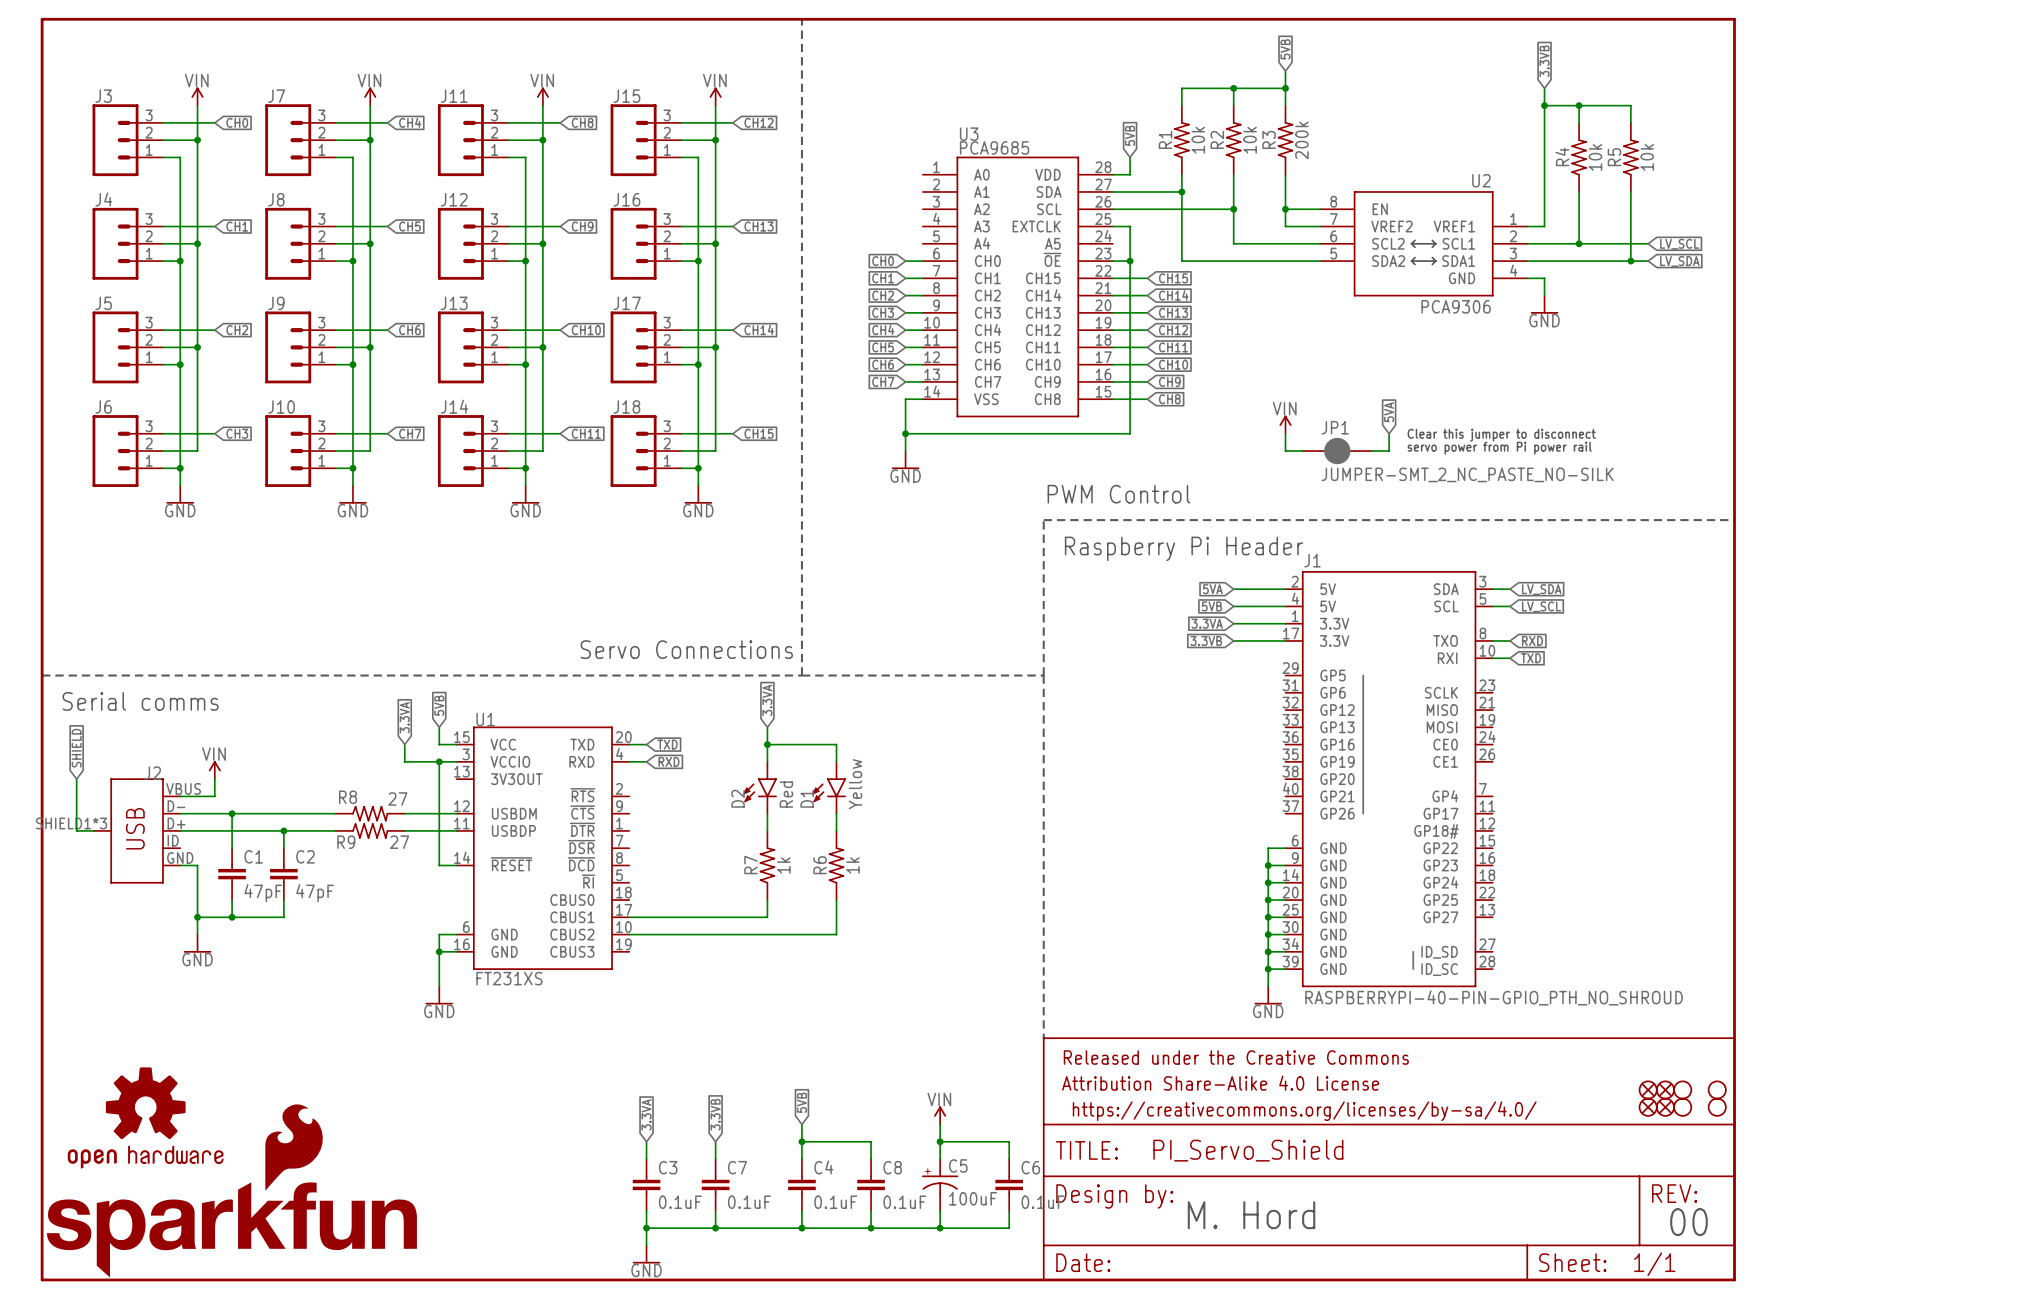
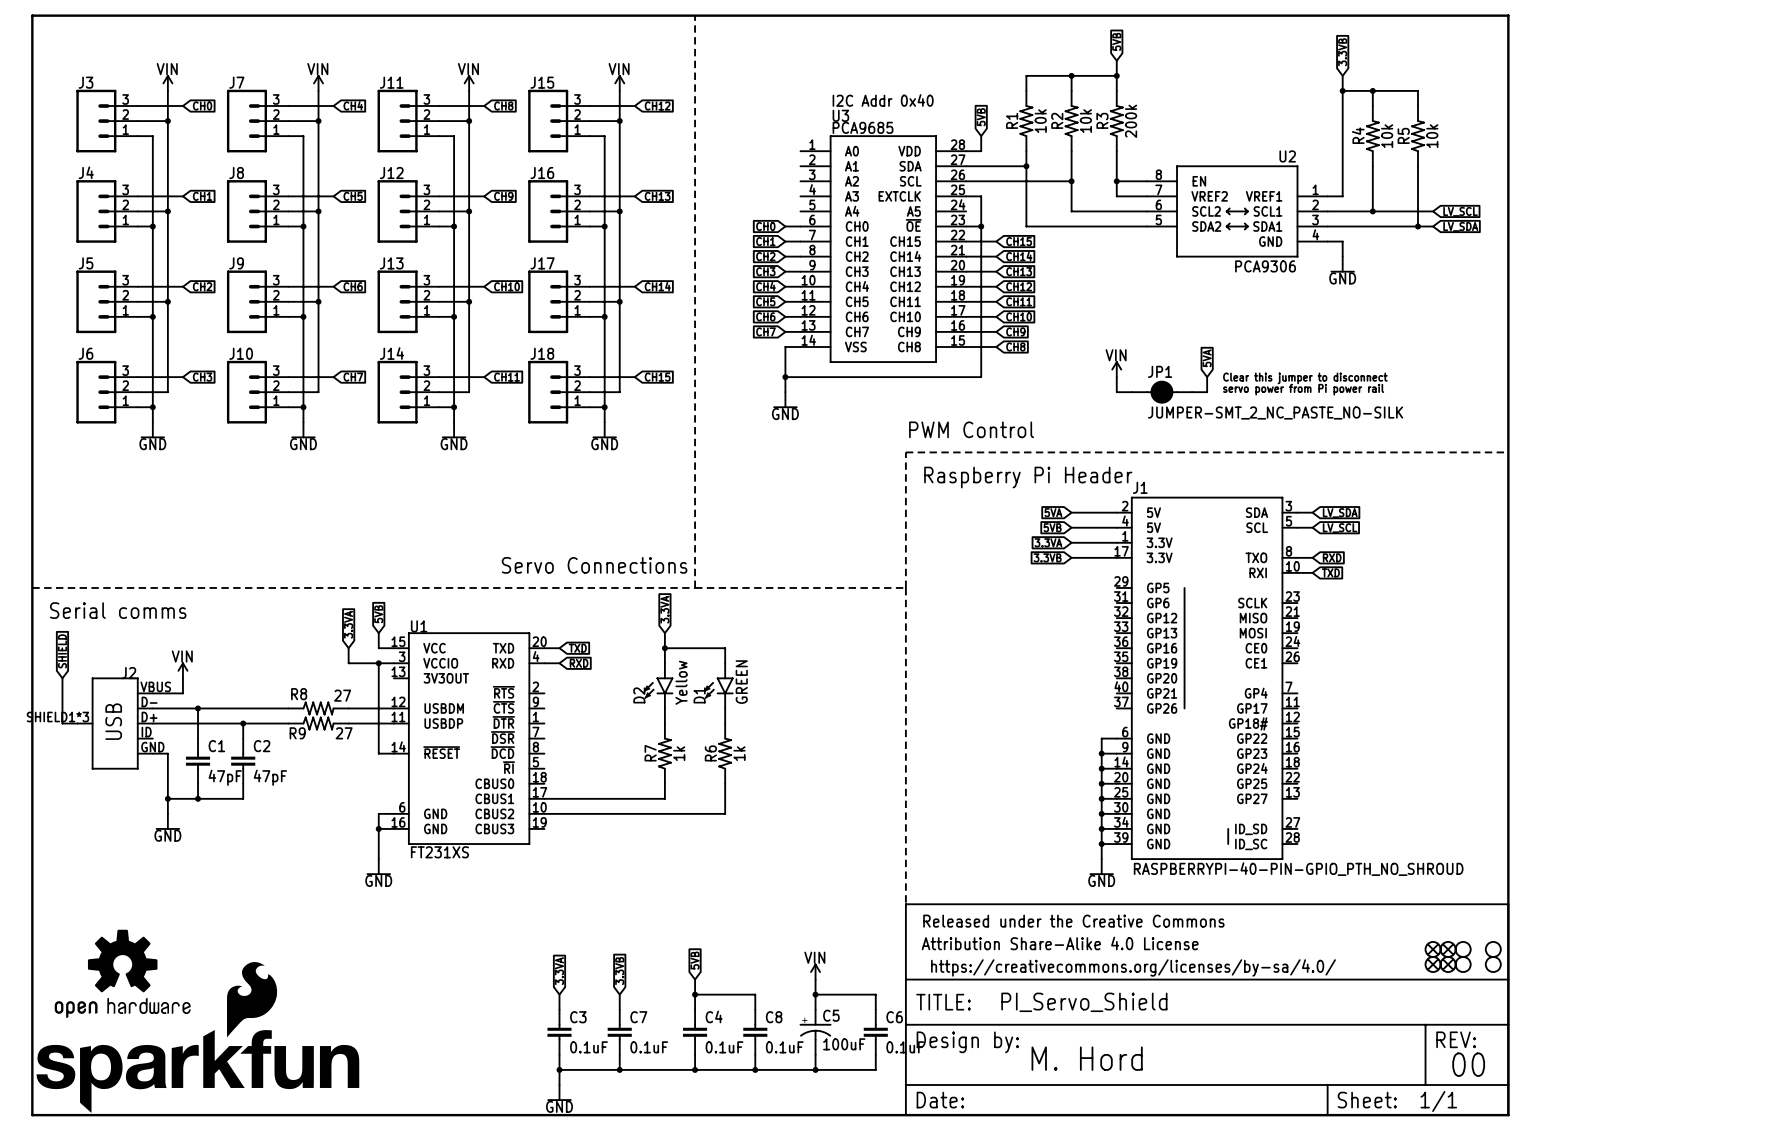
text: none -> I2C Addr 0x40 (883, 100)
D1 value: Yellow (855, 784) -> GREEN (741, 682)
D2 value: Red (786, 794) -> Yellow (681, 682)

